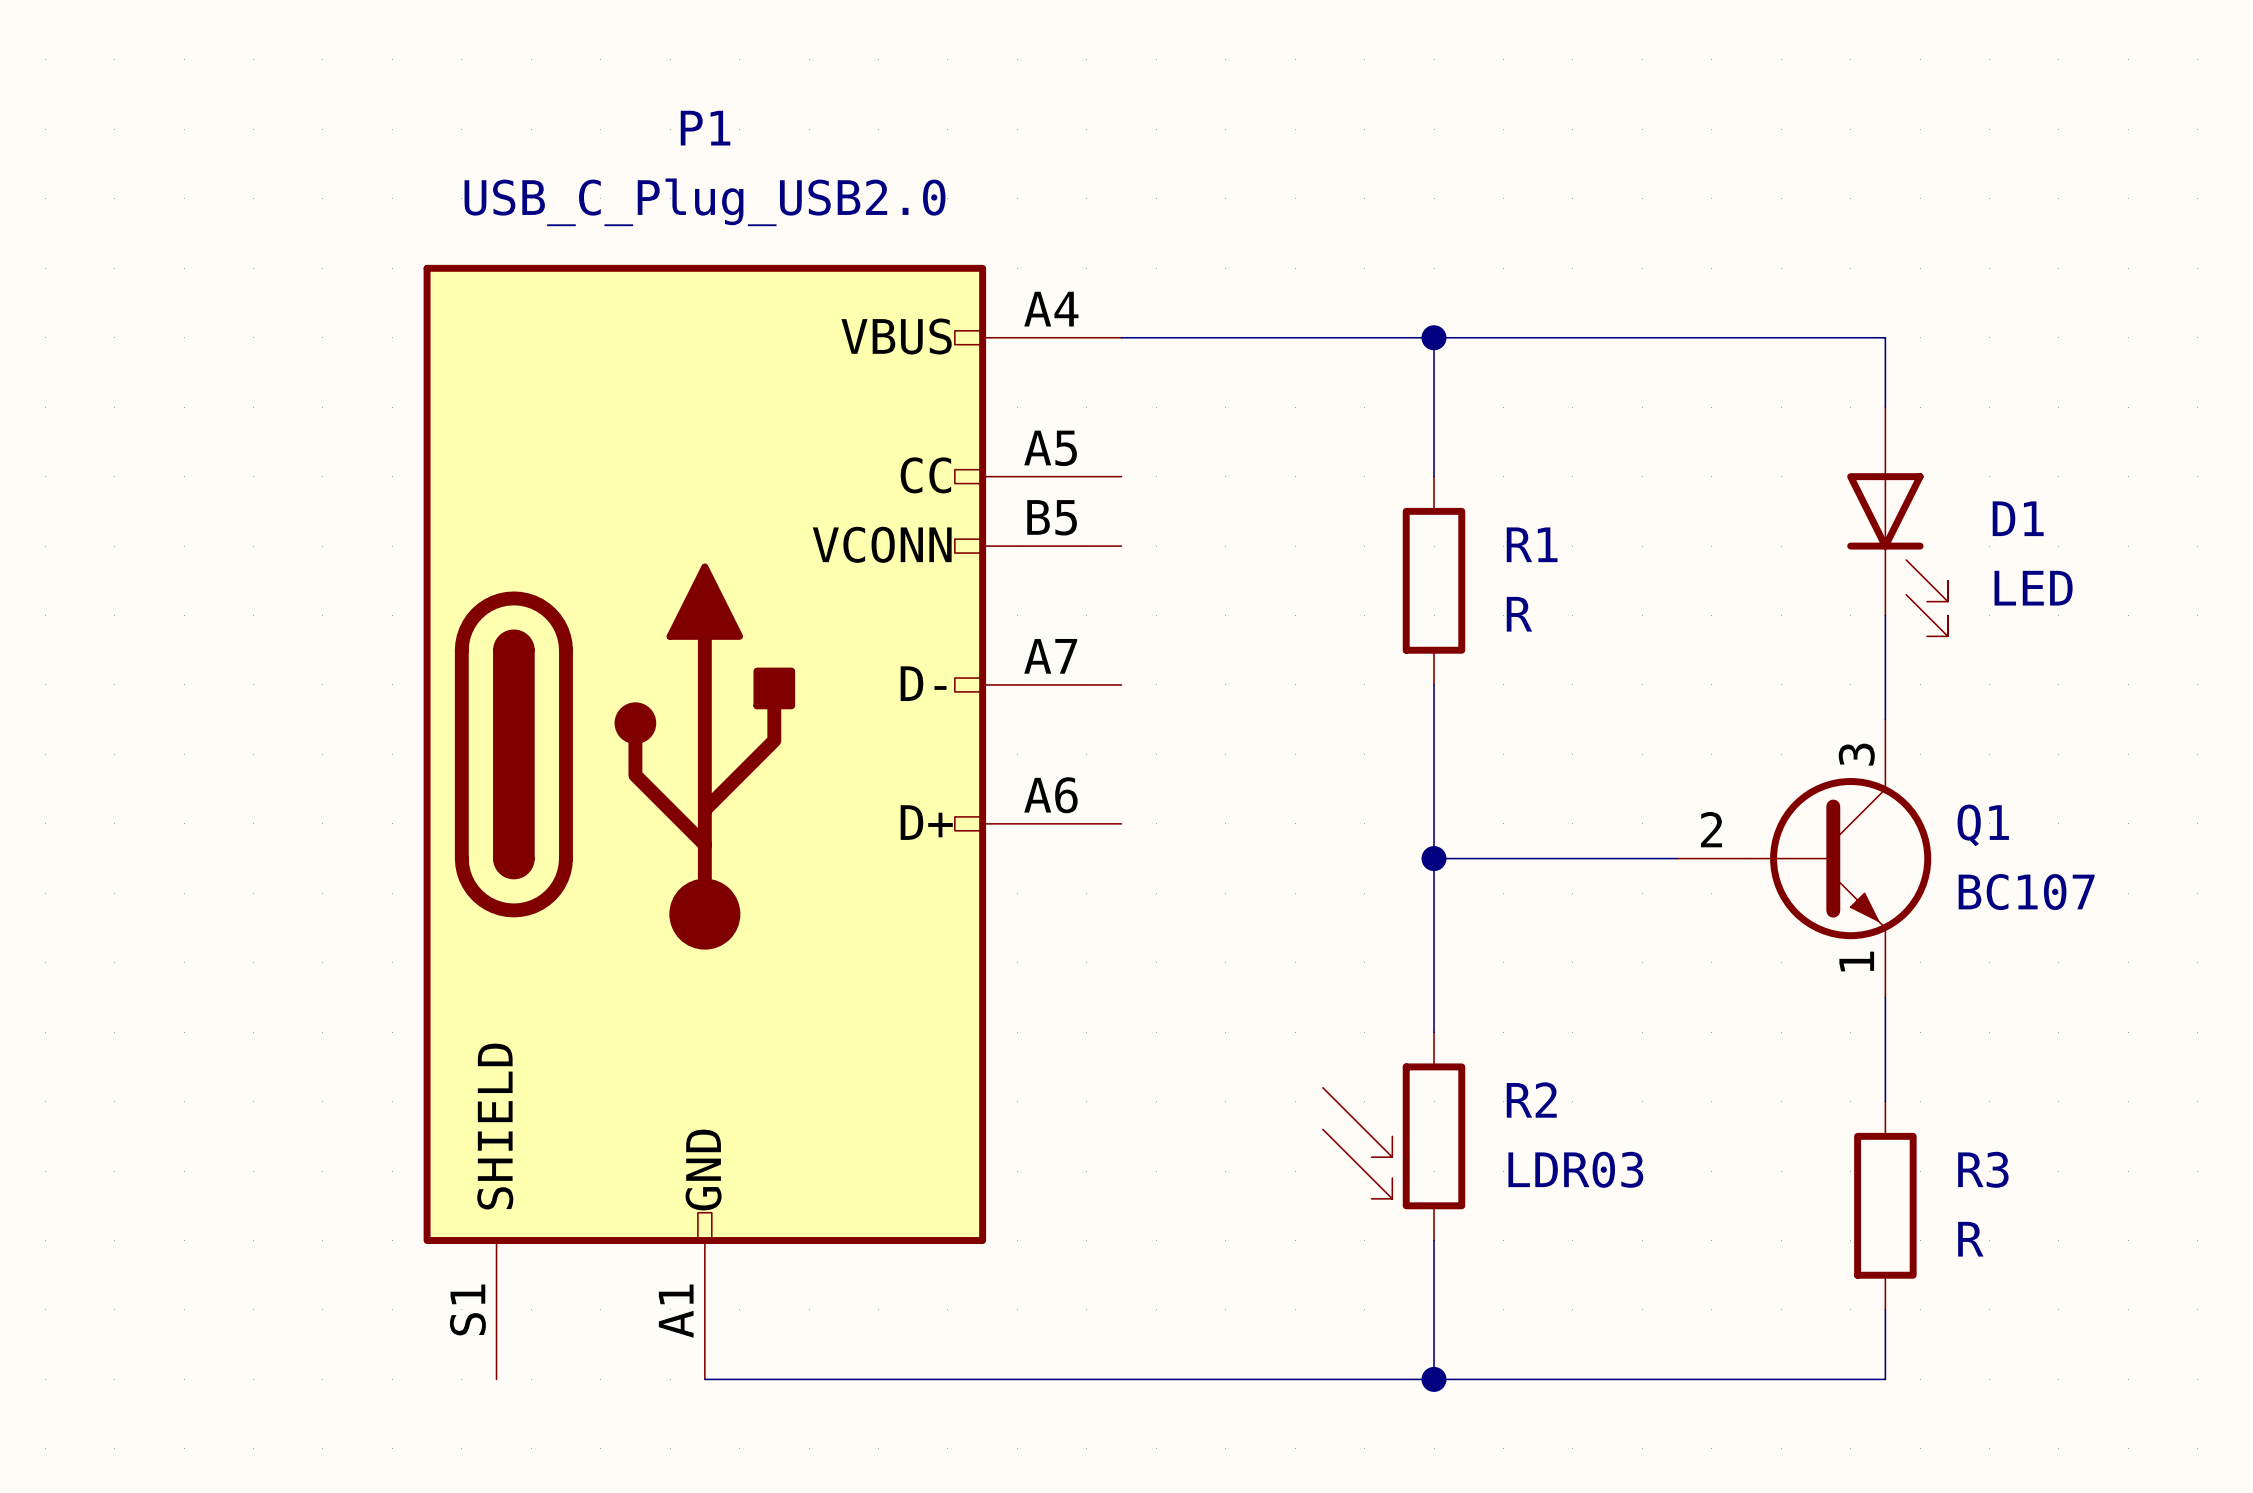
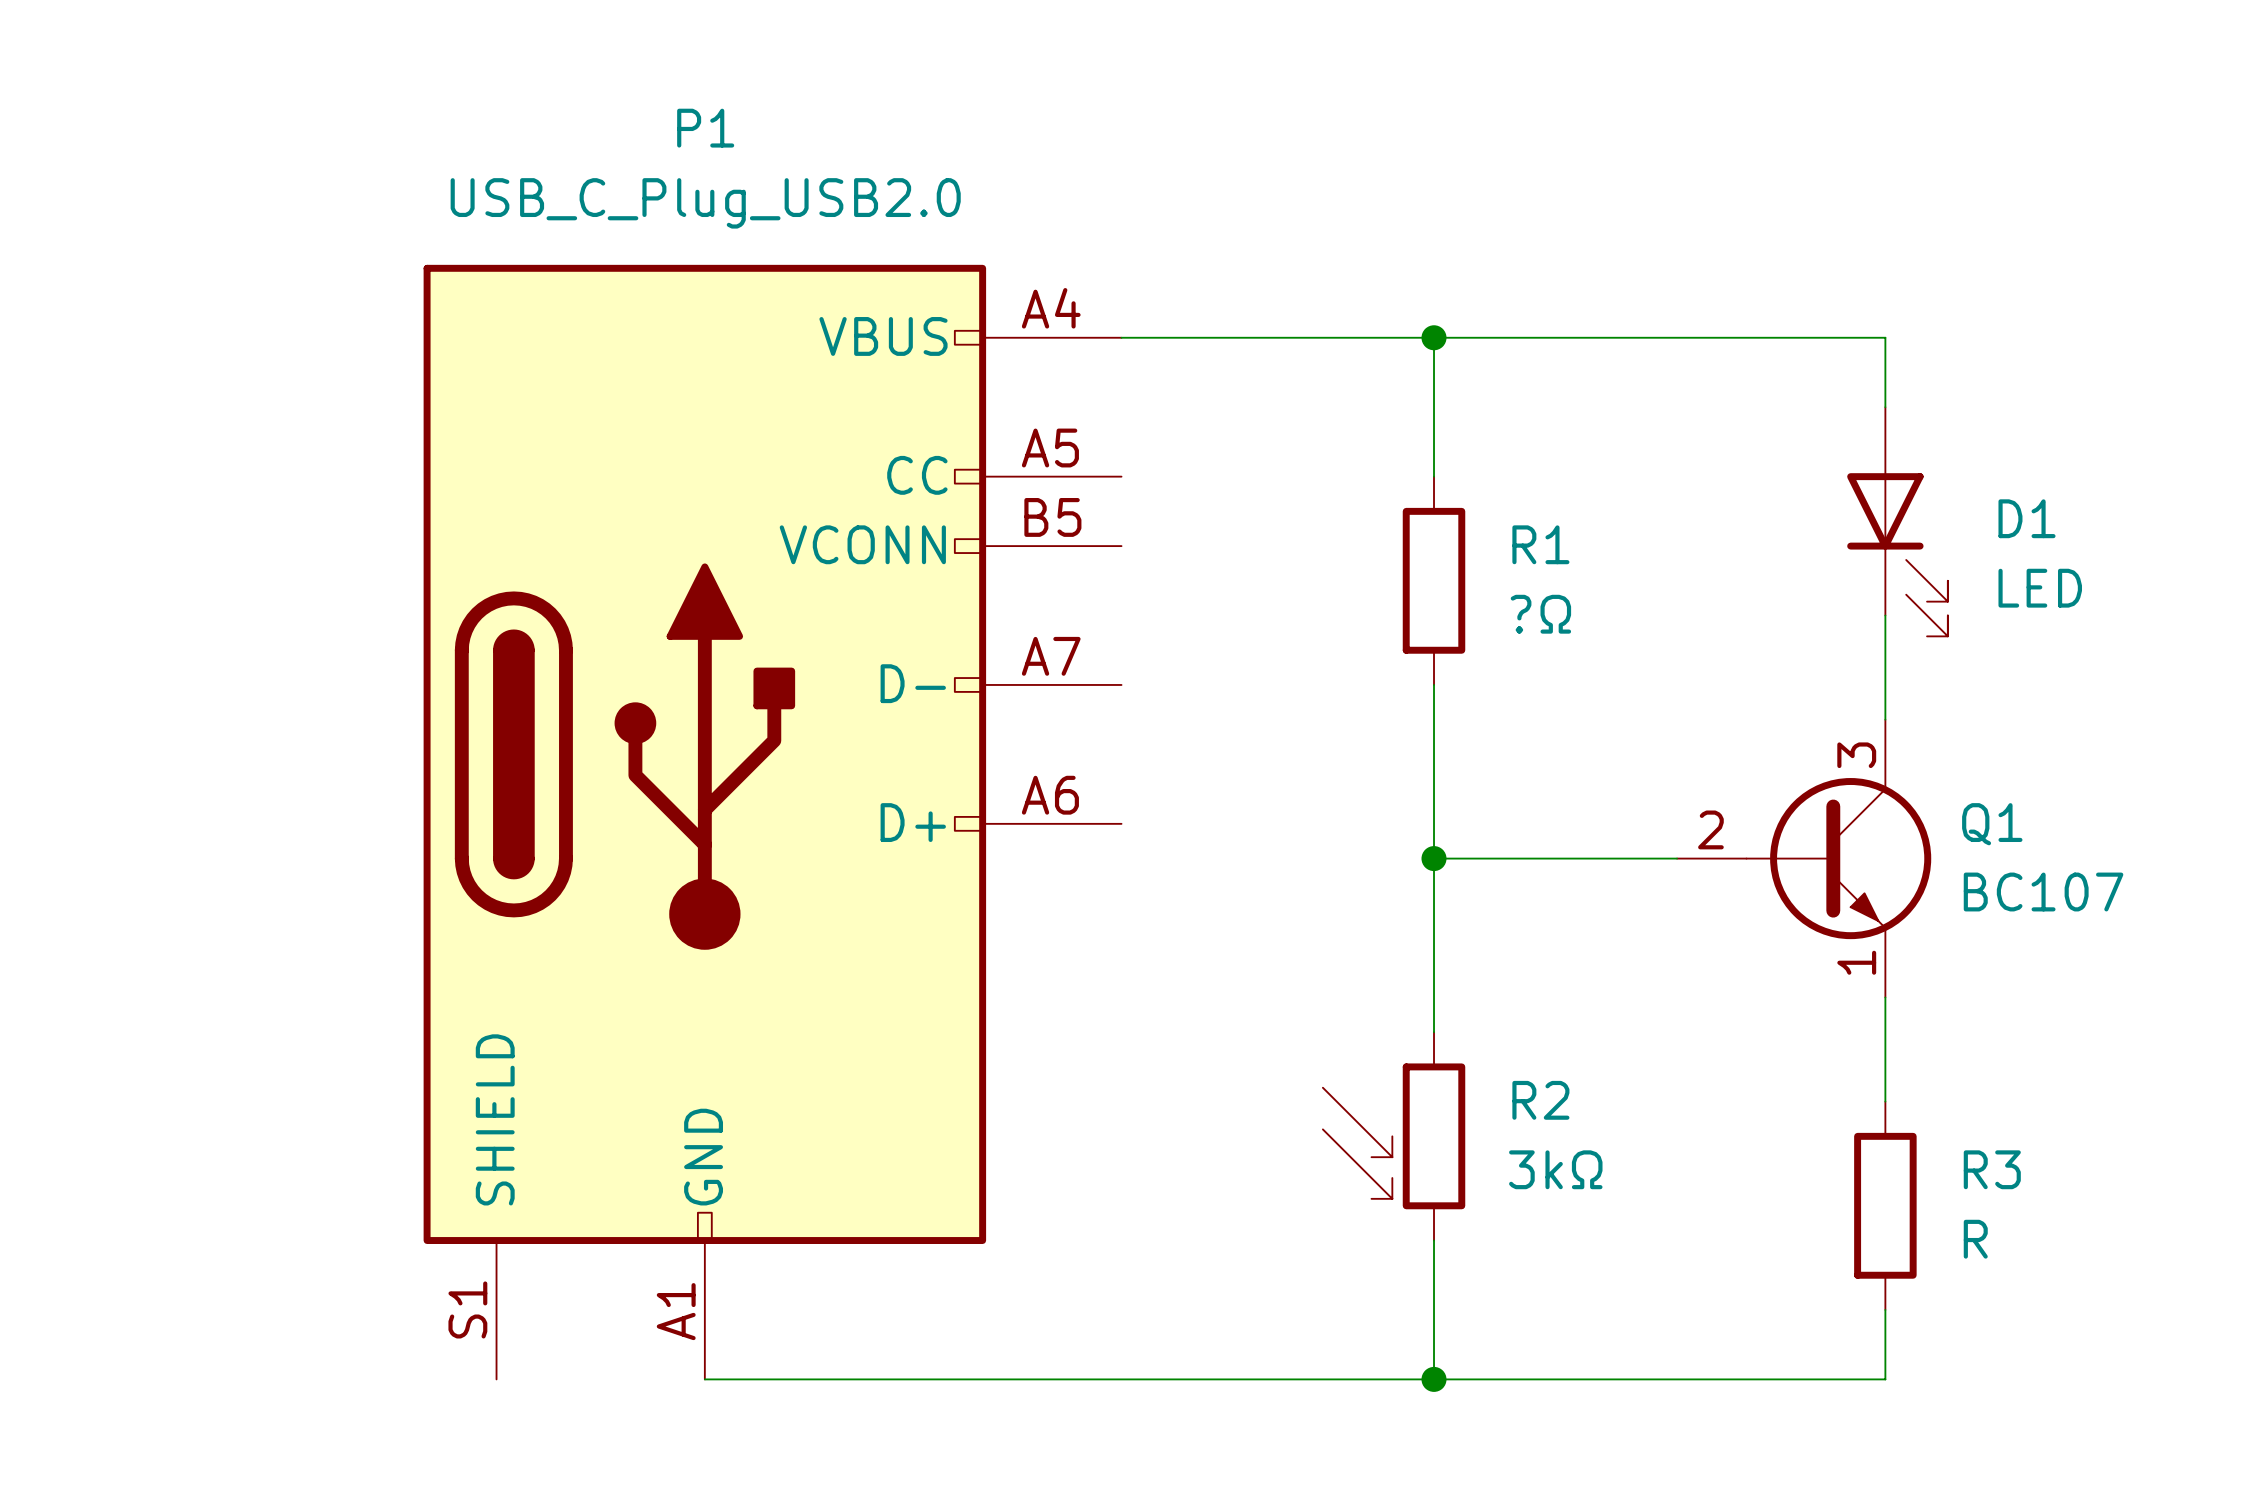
R1 value: R (1519, 614) -> ?Ω (1540, 614)
R2 value: LDR03 (1575, 1169) -> 3kΩ (1555, 1169)

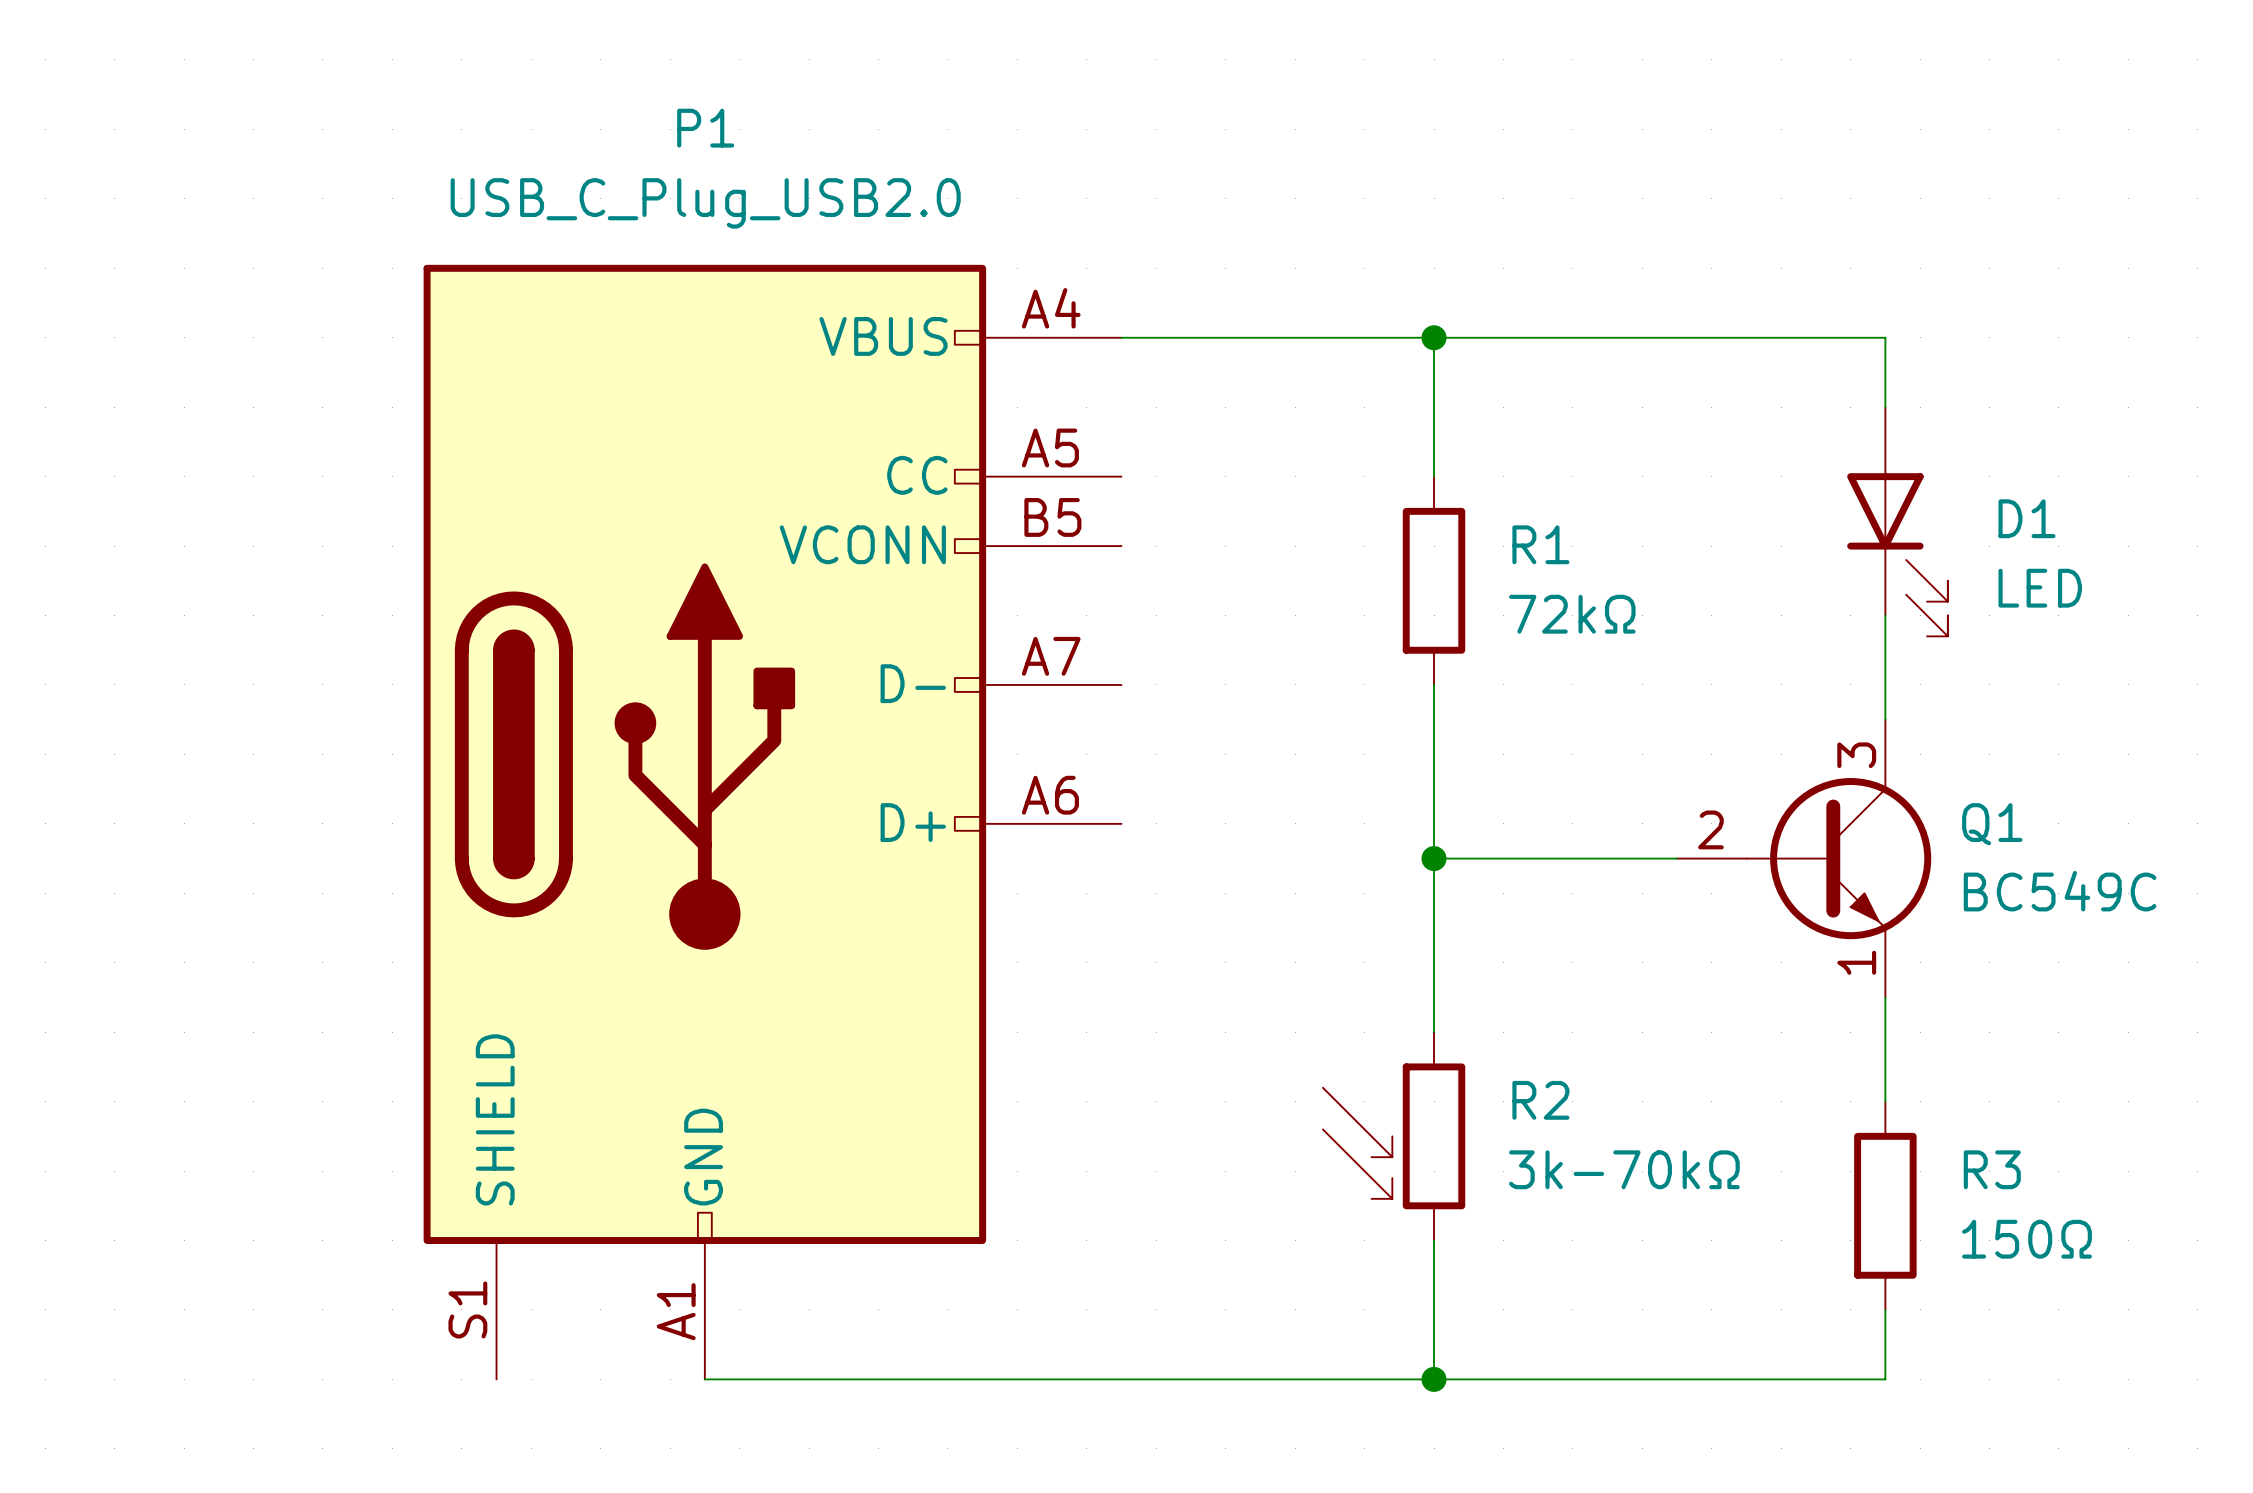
R1 value: ?Ω (1540, 614) -> 72kΩ (1572, 614)
Q1 value: BC107 (2043, 892) -> BC549C (2060, 891)
R2 value: 3kΩ (1555, 1169) -> 3k-70kΩ (1624, 1169)
R3 value: R (1975, 1239) -> 150Ω (2027, 1239)

